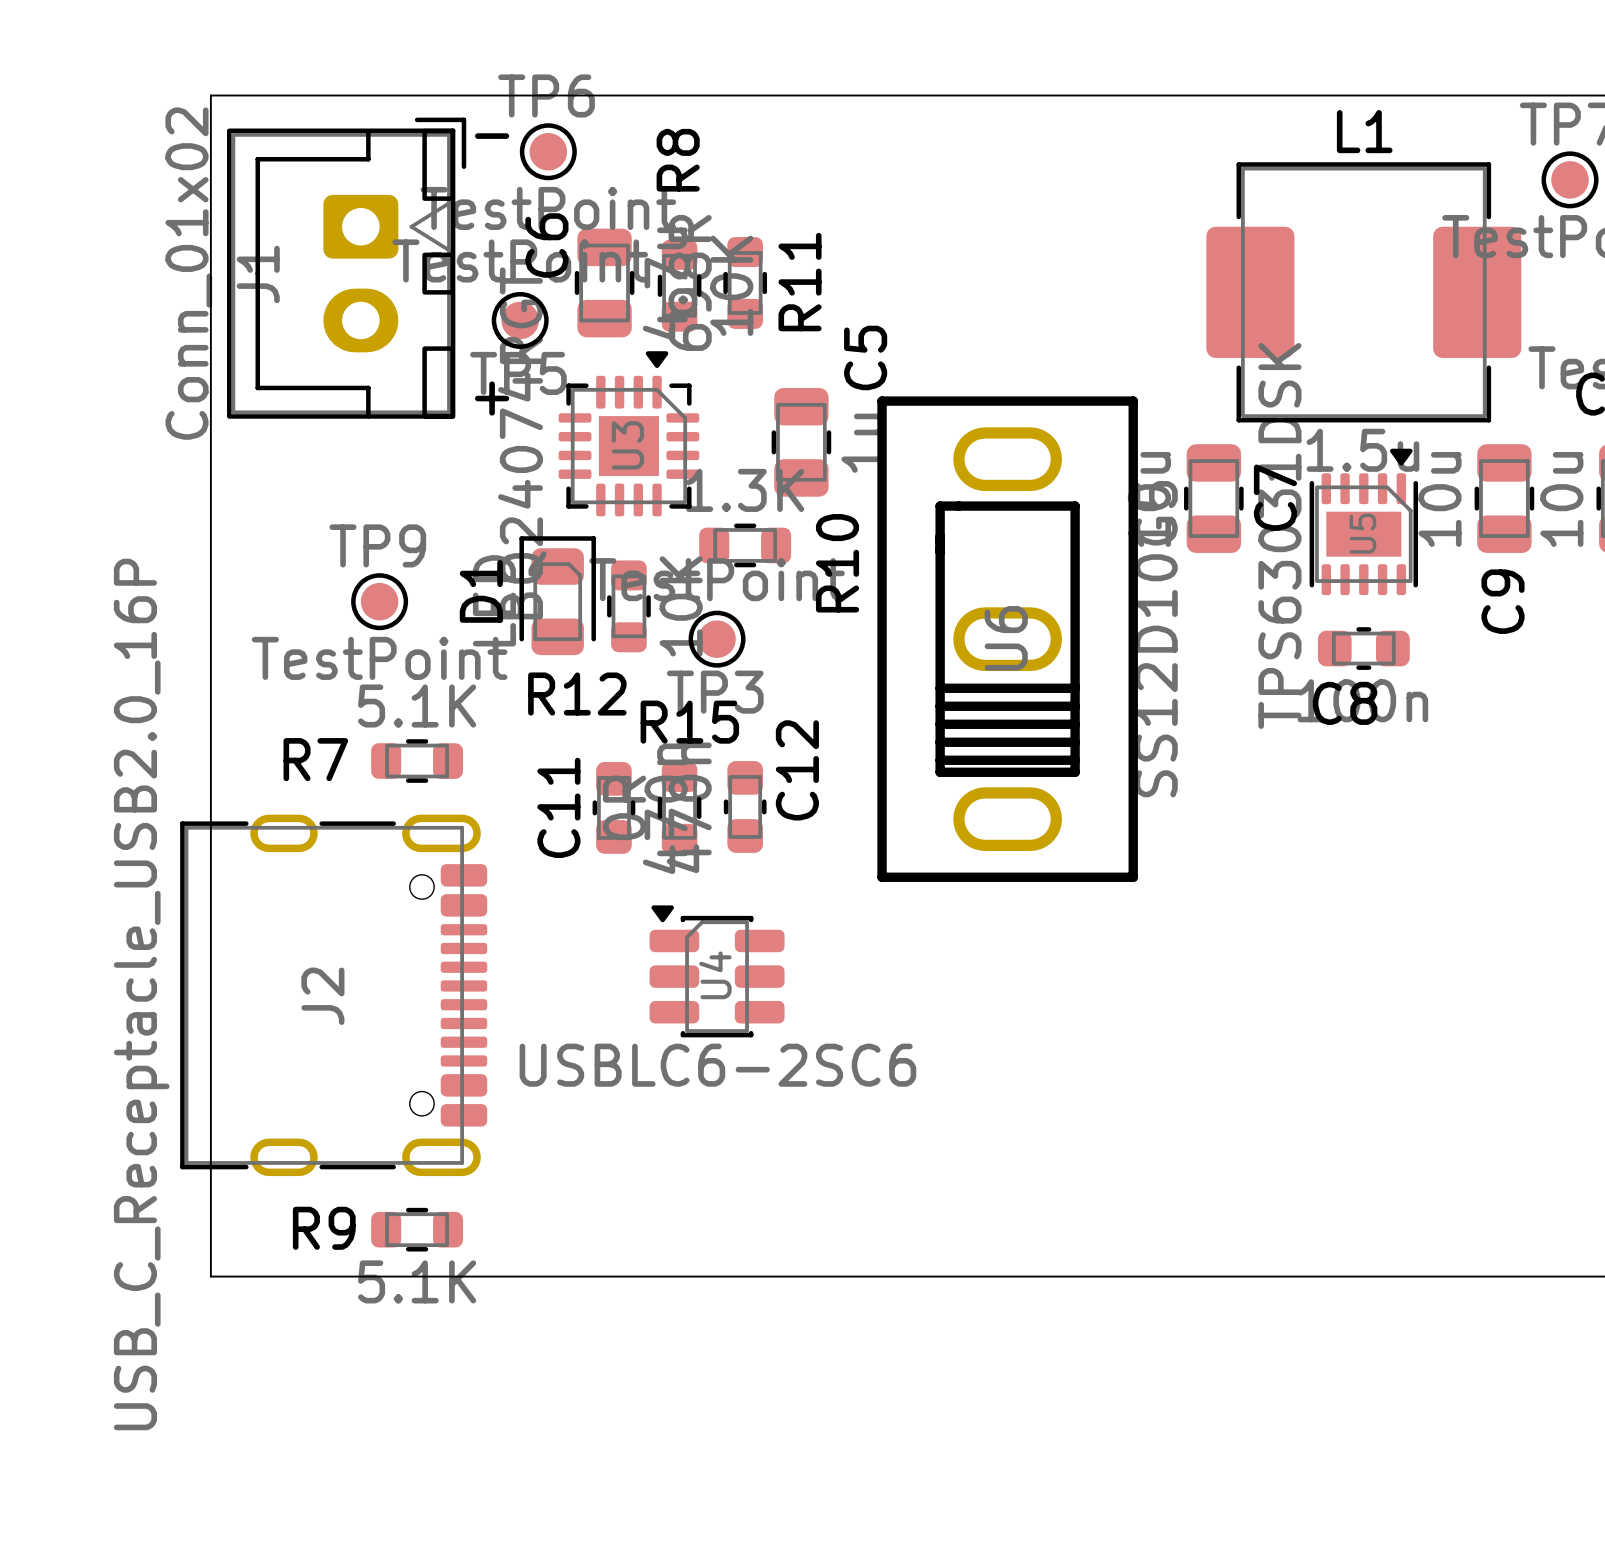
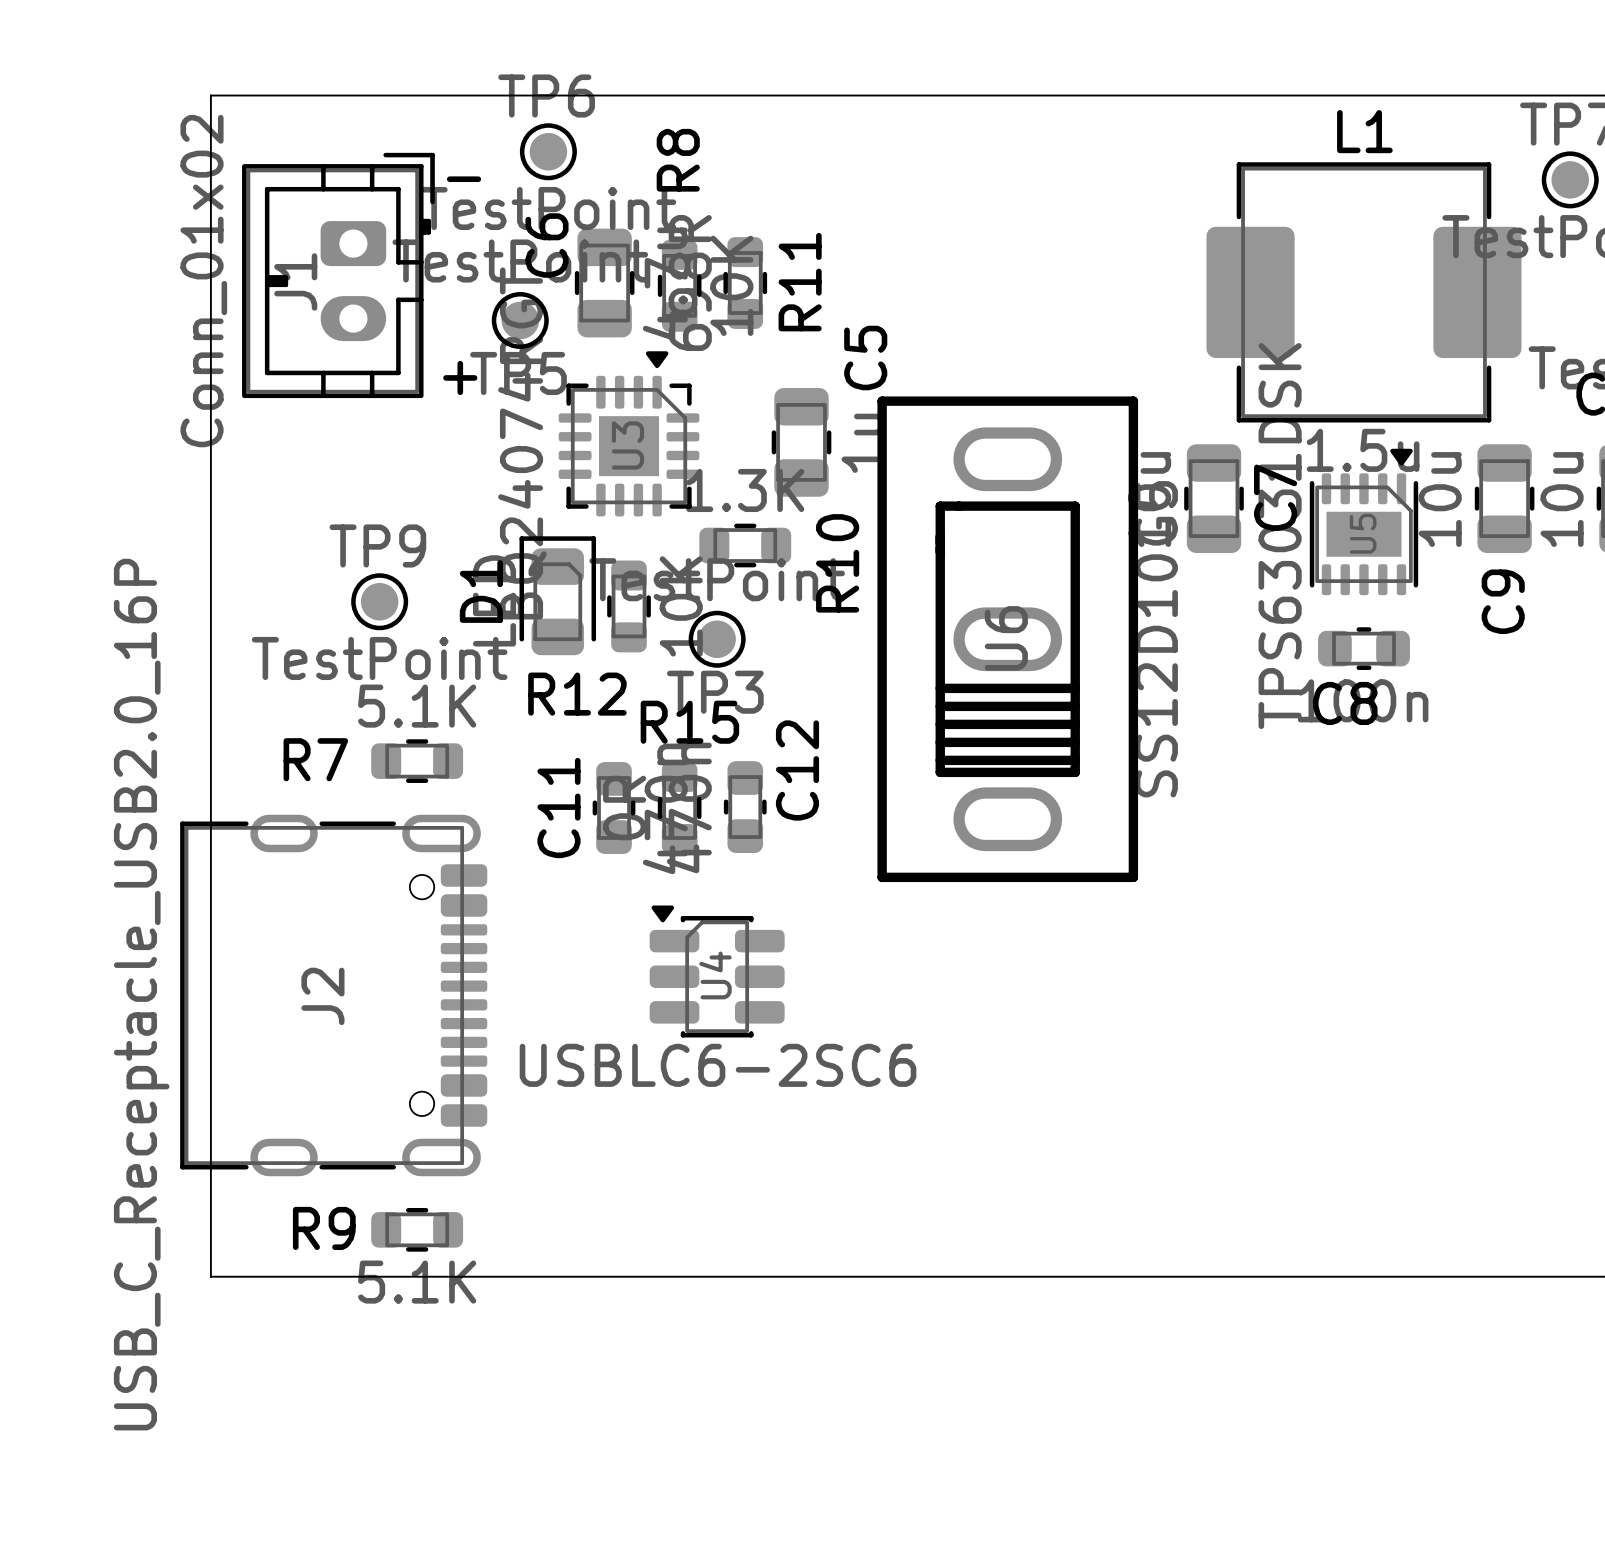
J1 footprint: [227, 117, 467, 419] -> [242, 152, 435, 399]
text position: - (492, 136) -> - (464, 179)
text position: + (492, 398) -> + (460, 377)

